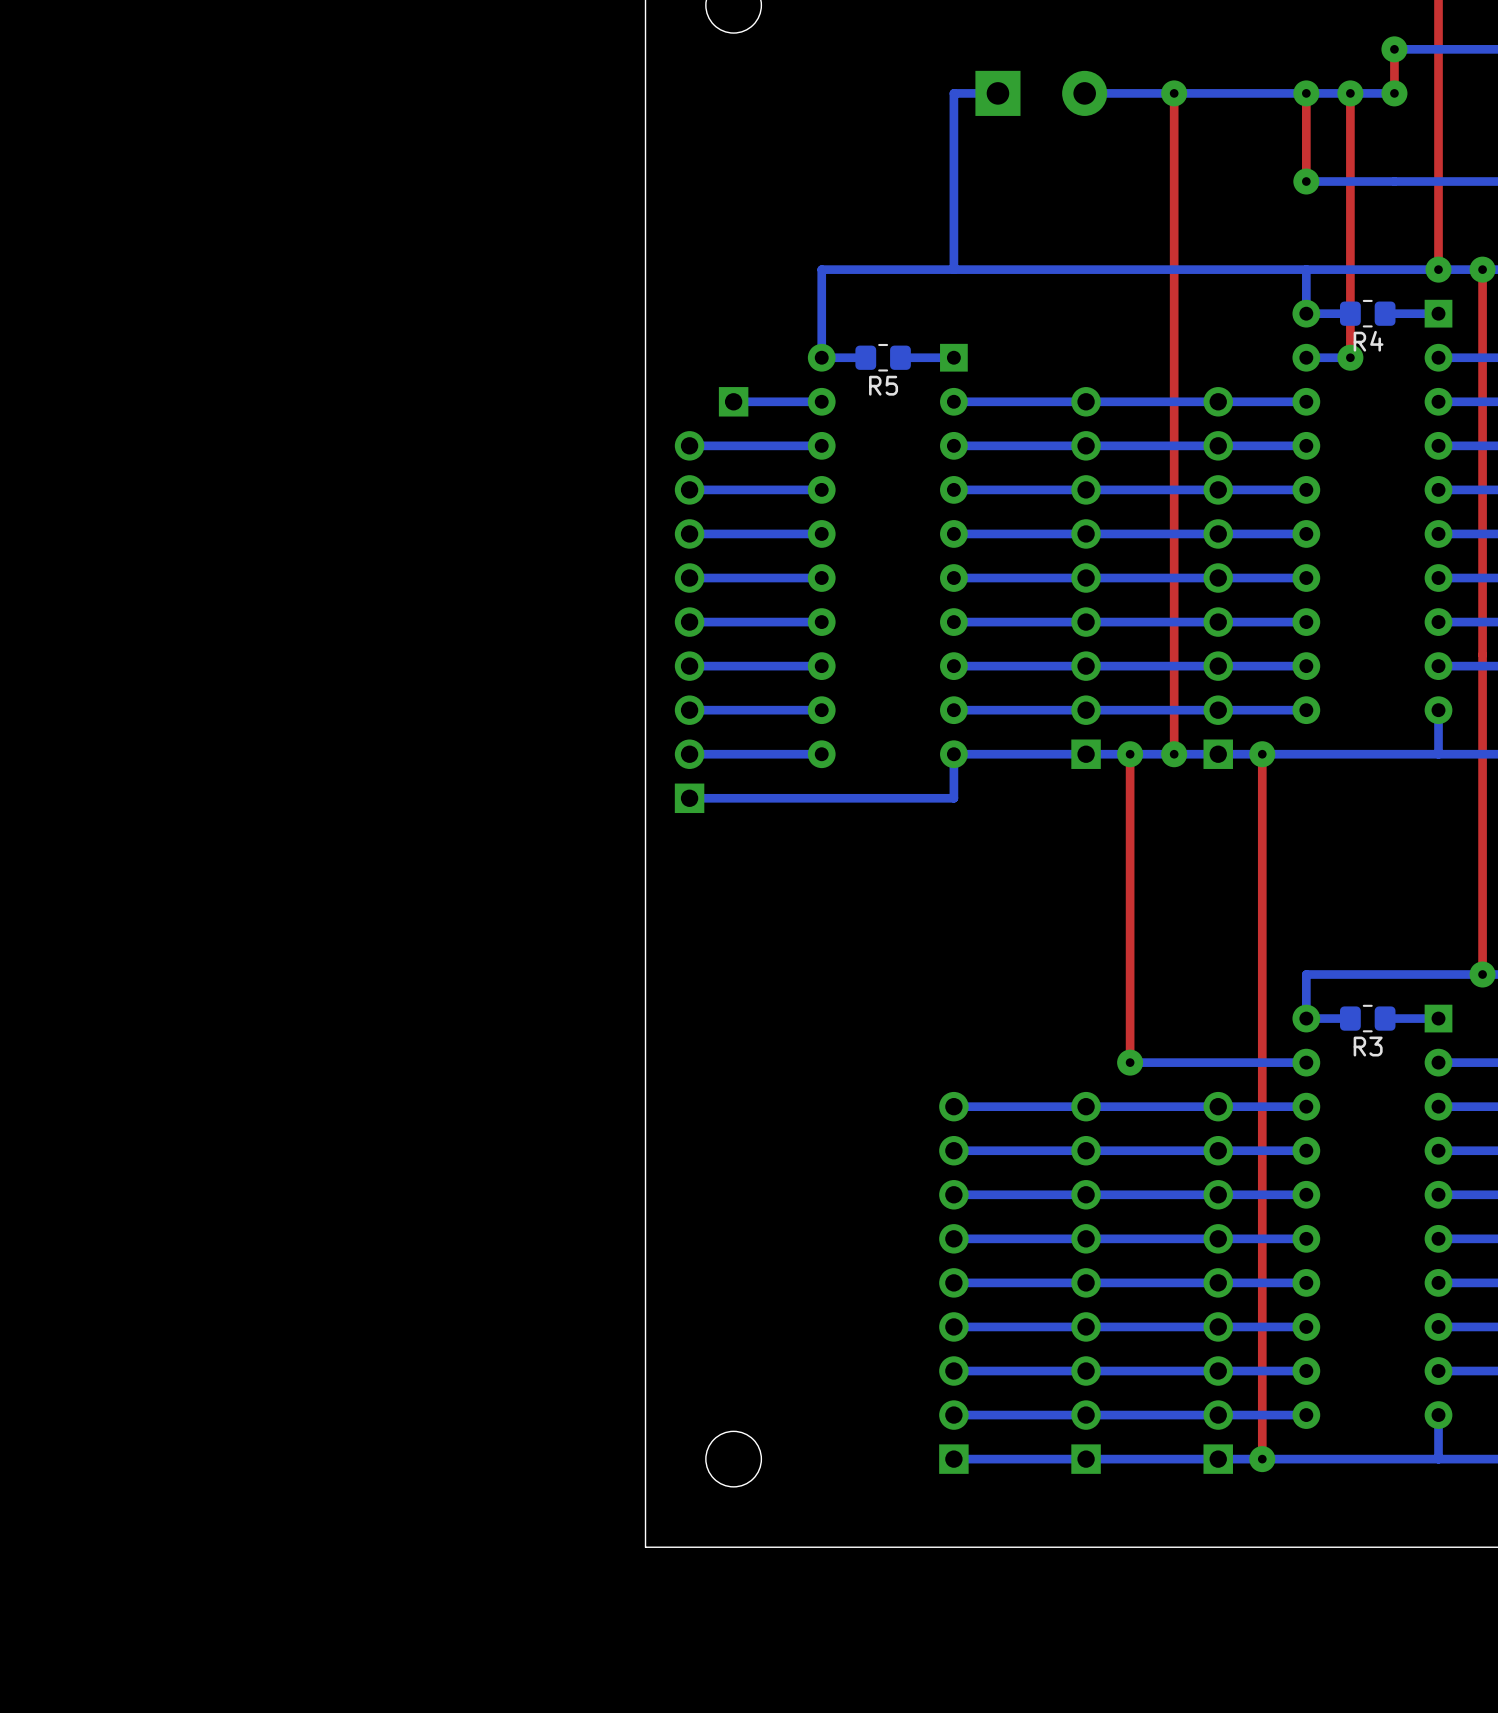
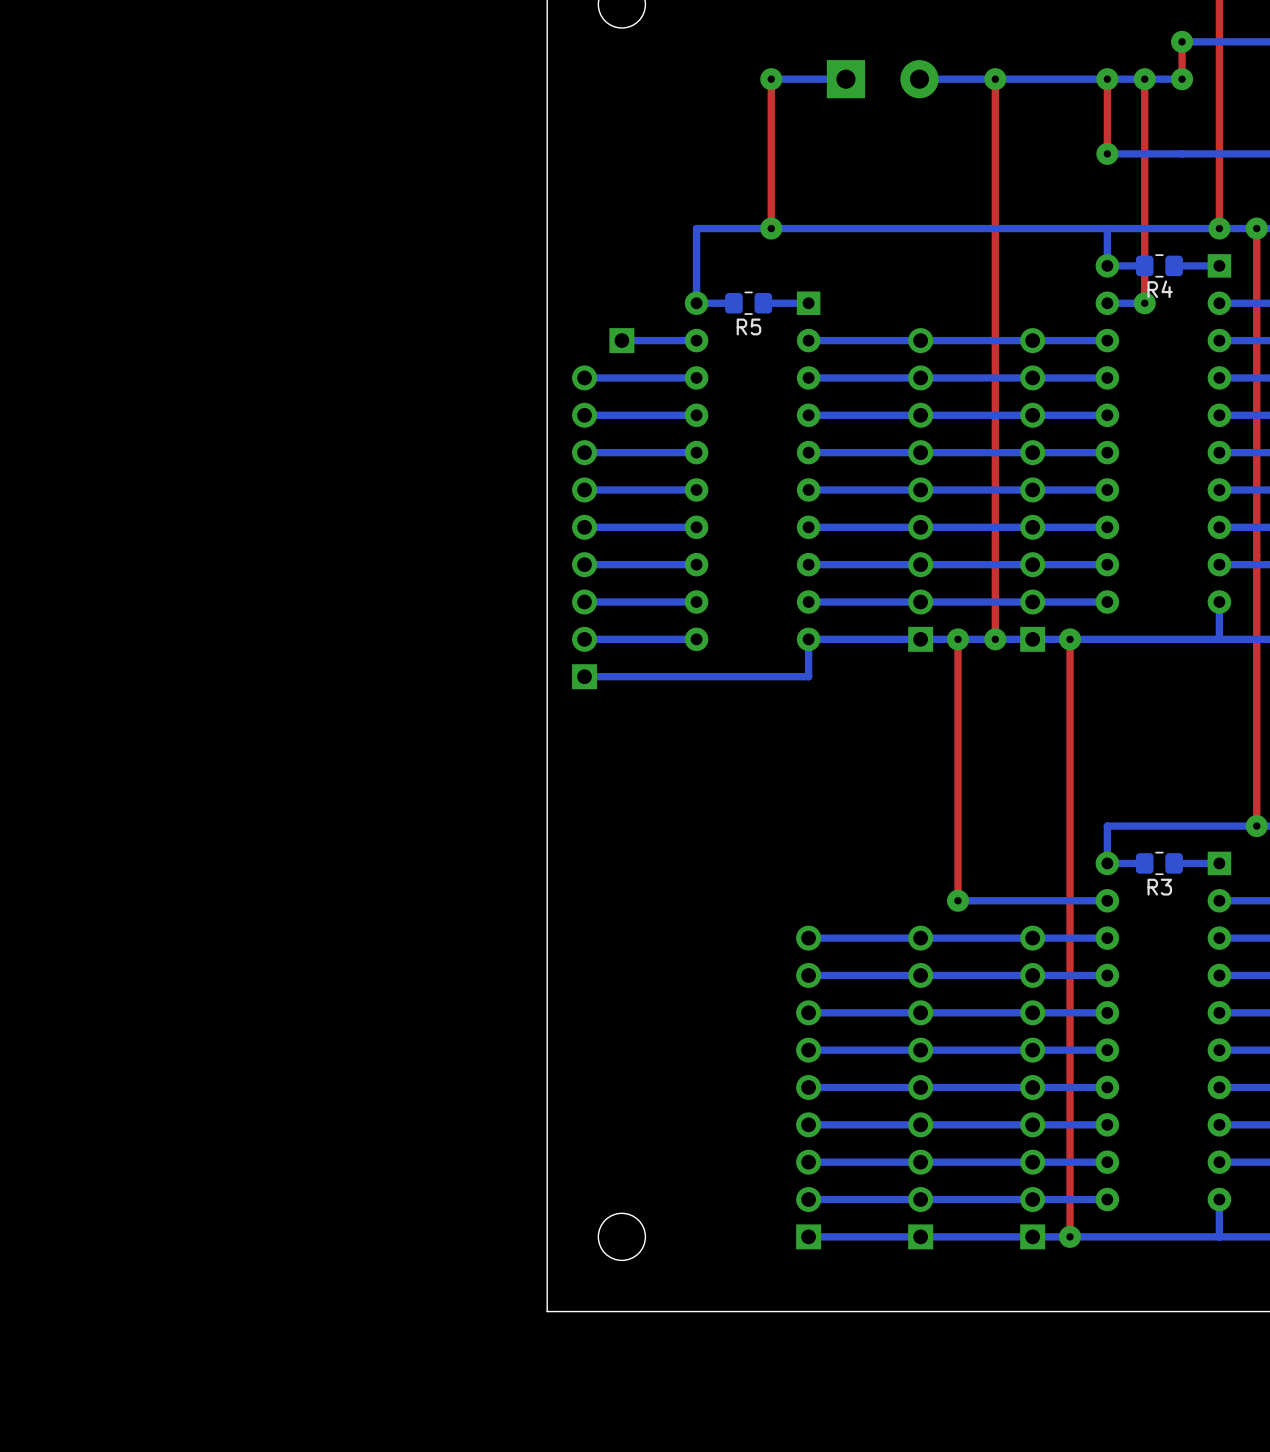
top track: none -> (771, 79) (771, 228)
via: none -> (771, 79)
bottom track: (953, 93) (953, 269) -> (808, 79) (771, 79)
via: none -> (771, 228)

